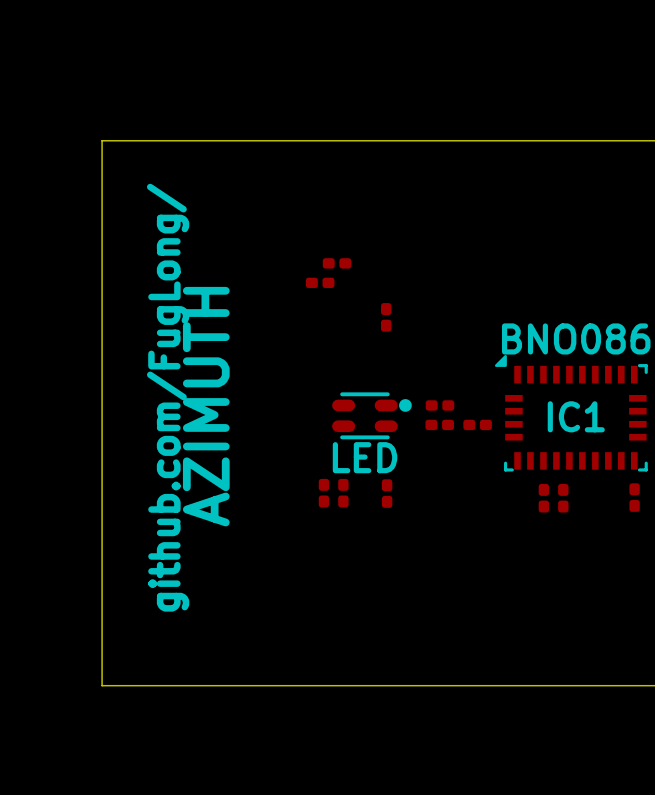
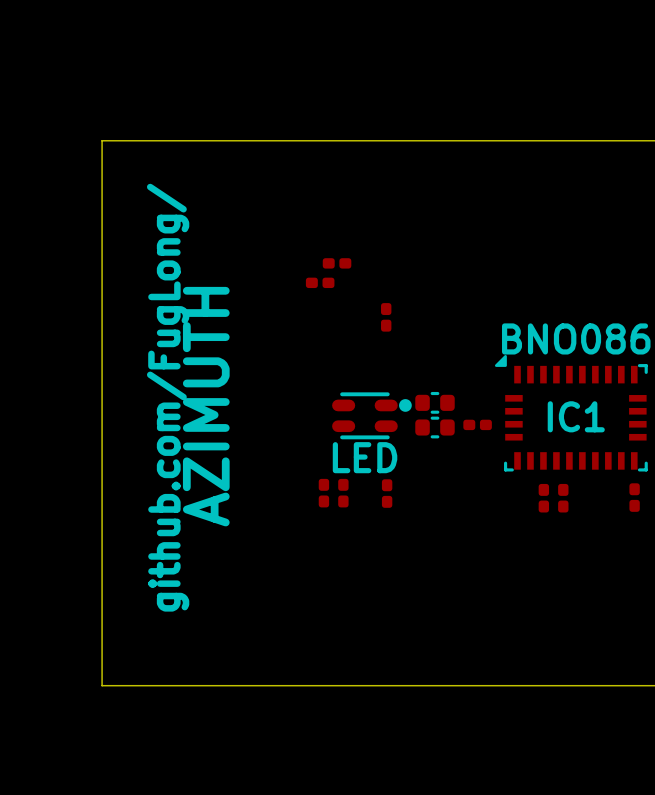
part footprint: [425, 400, 455, 411] -> [415, 391, 455, 414]
part footprint: [425, 419, 455, 431] -> [415, 416, 455, 439]

